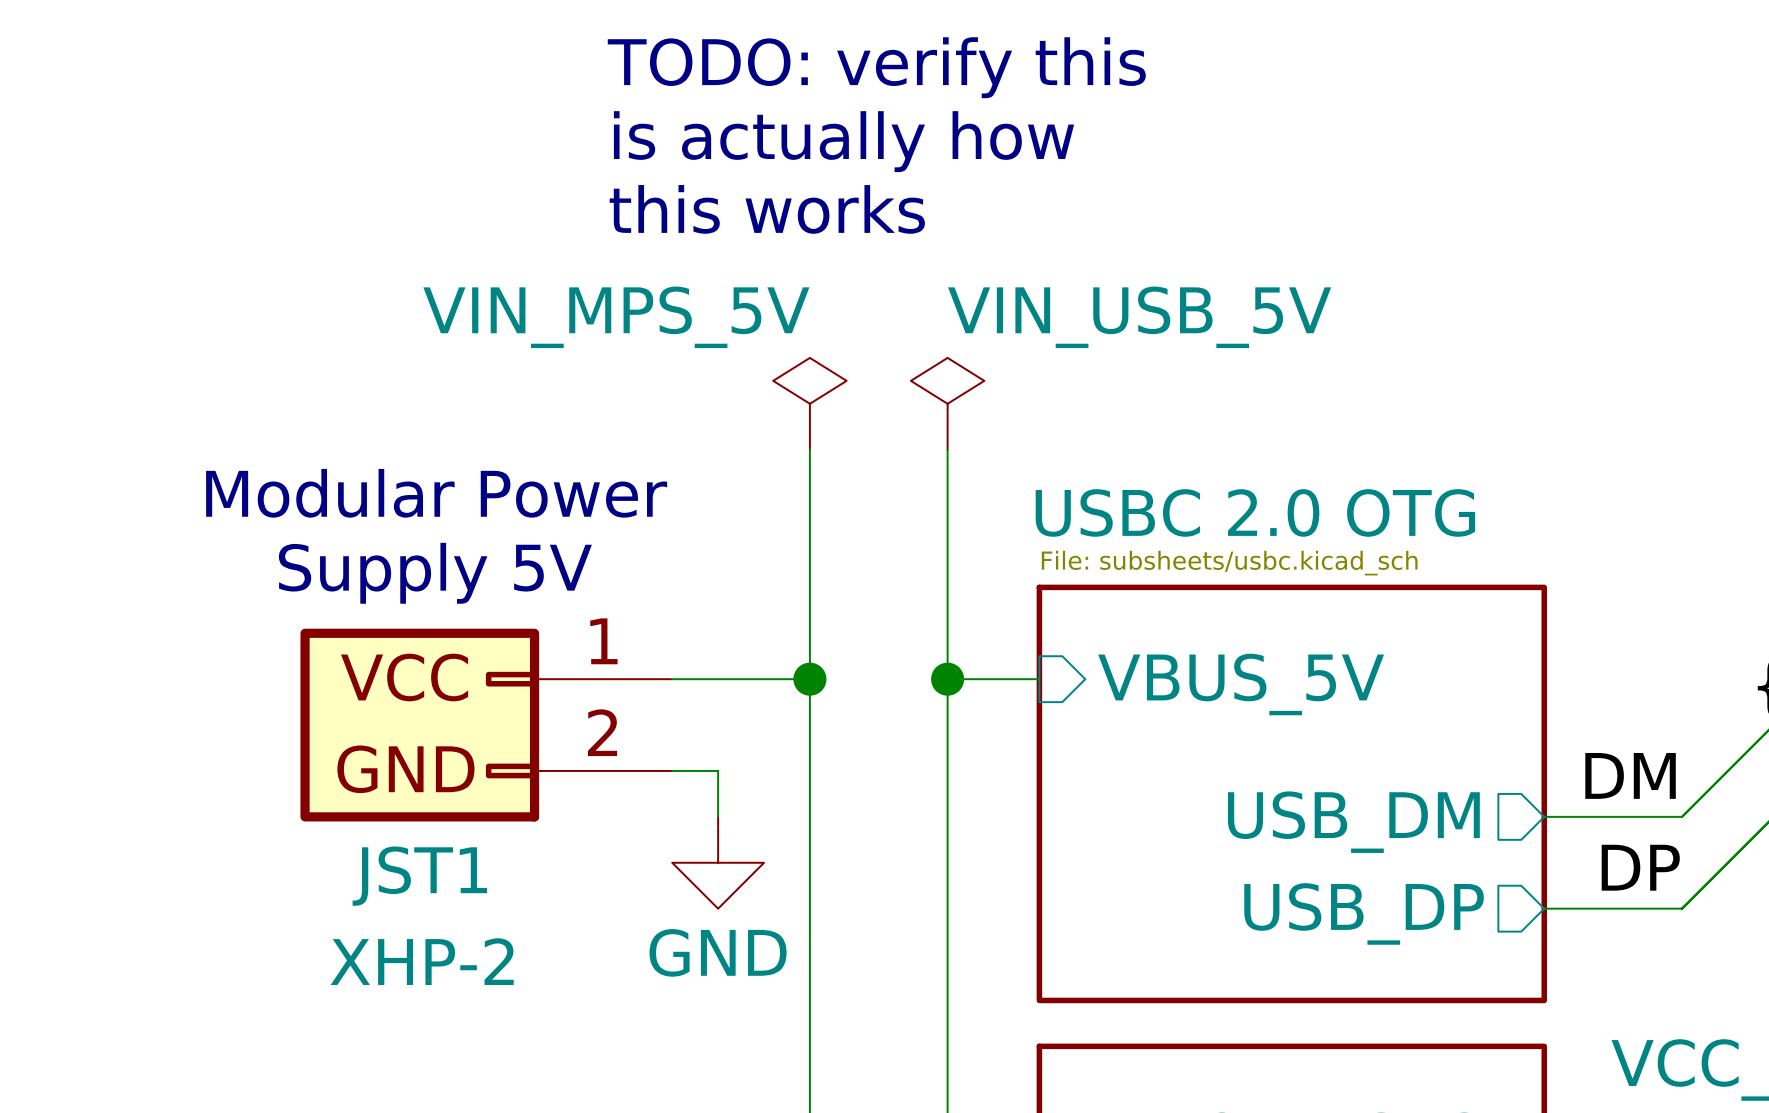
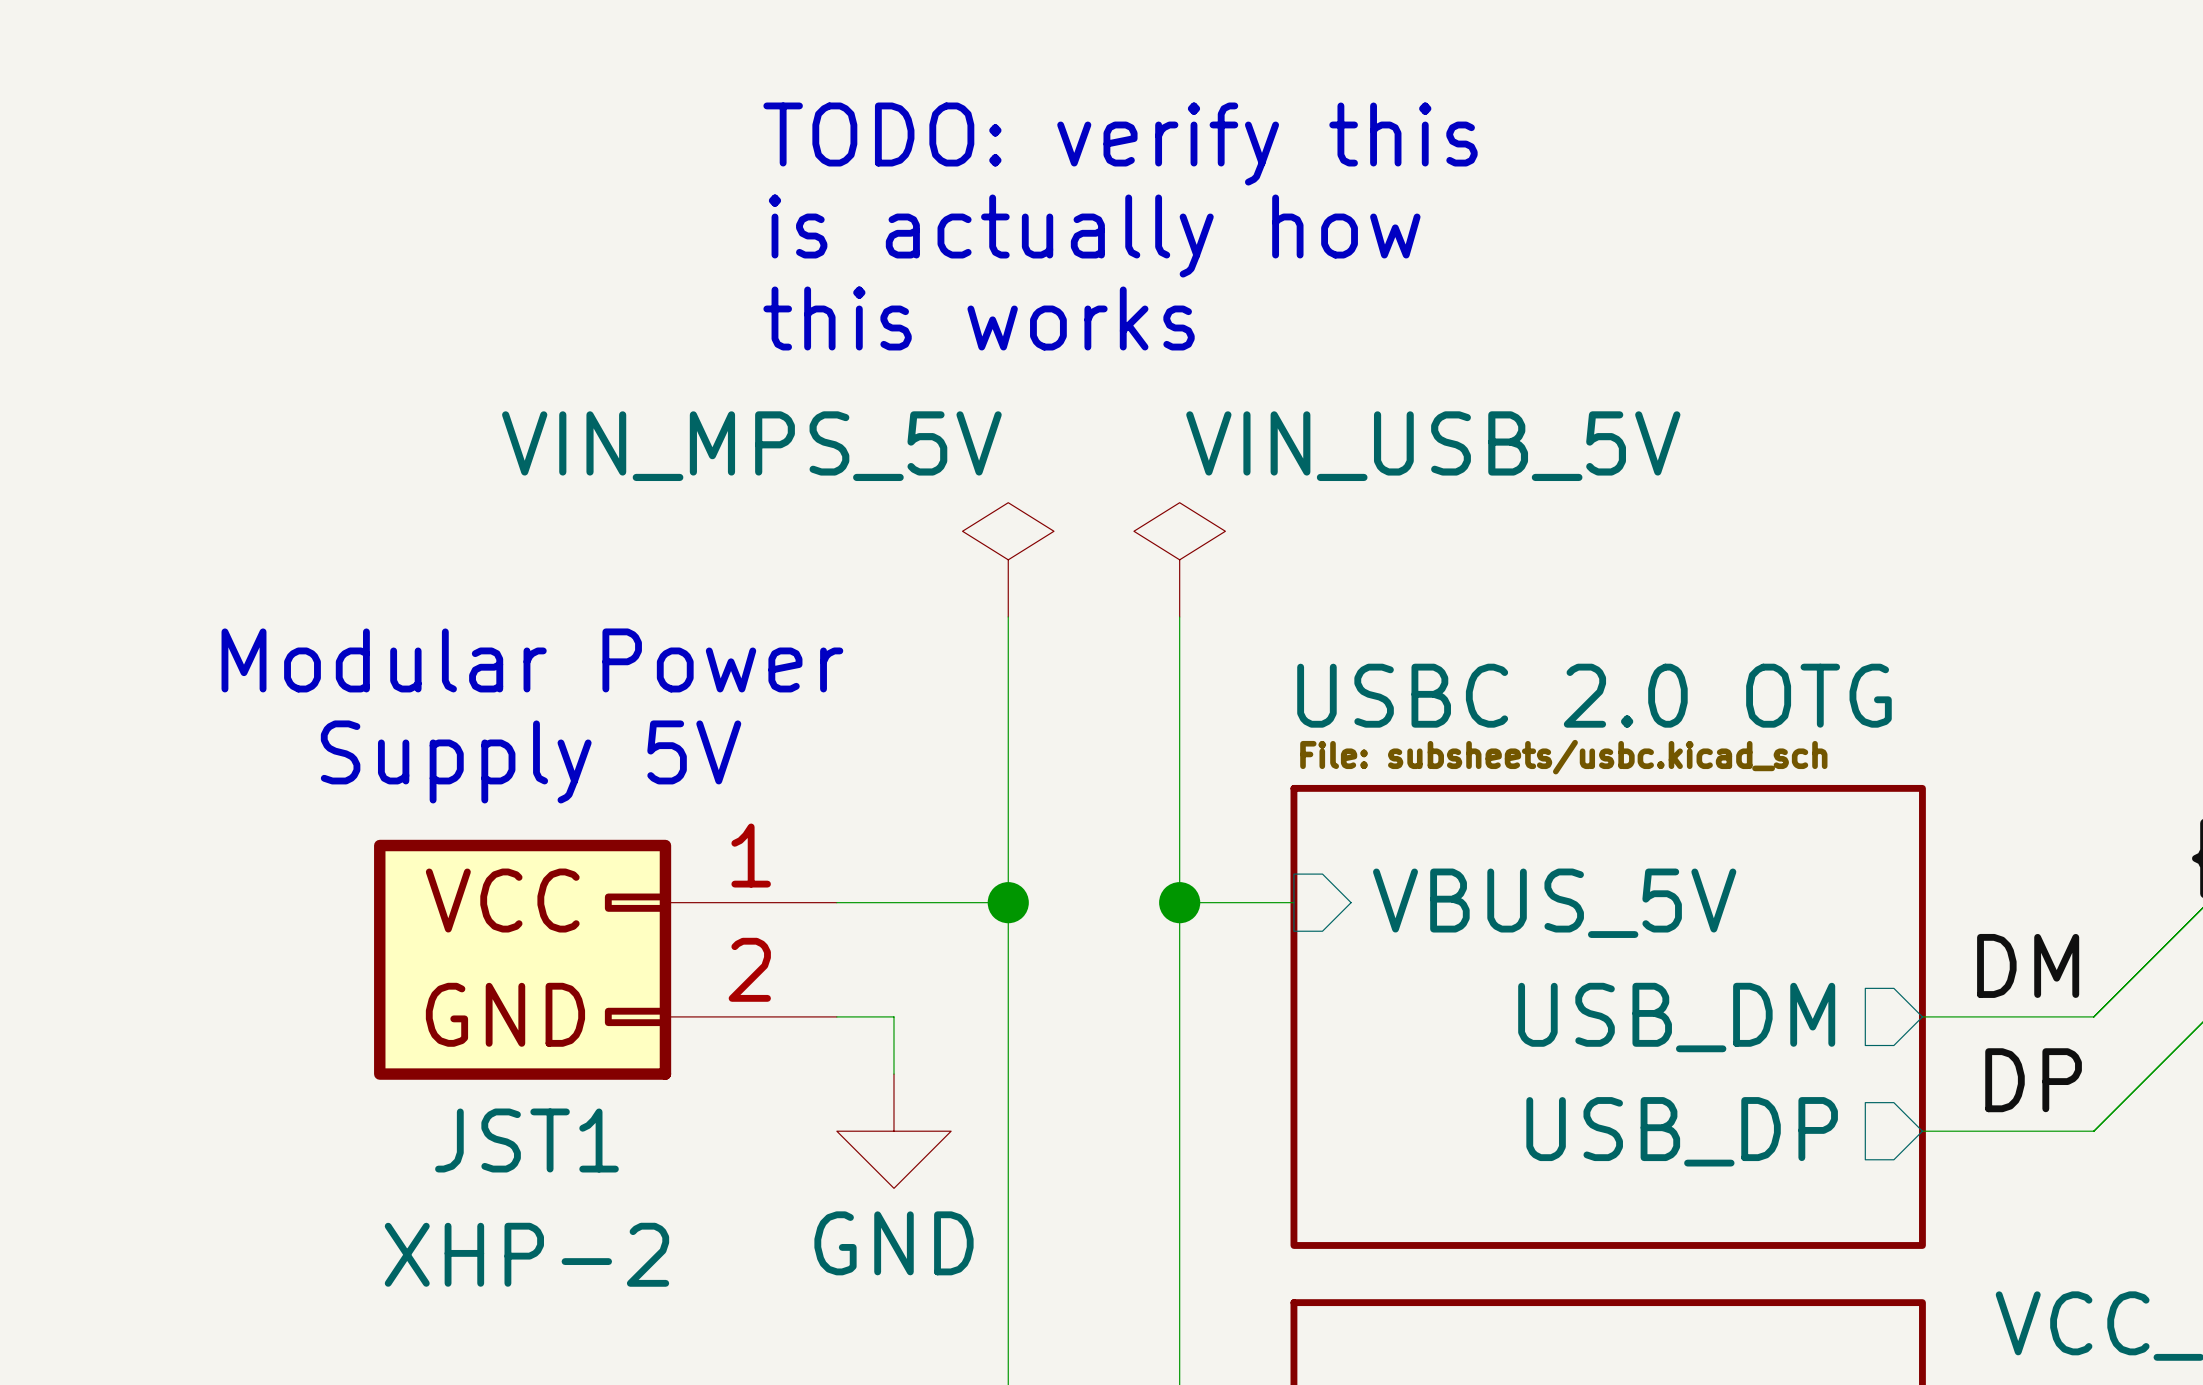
text position: TODO: verify this (876, 67) -> TODO: verify this (1120, 144)
text position: is actually how (844, 141) -> is actually how (1094, 236)
text position: this works (767, 209) -> this works (979, 318)
power symbol position: VIN_MPS_5V (809, 403) -> VIN_MPS_5V (1008, 559)
power symbol position: VIN_USB_5V (947, 403) -> VIN_USB_5V (1179, 559)
text position: Modular Power (436, 493) -> Modular Power (532, 660)
text position: Supply 5V (435, 573) -> Supply 5V (531, 761)
sheet USBC 2.0 OTG shape: [1036, 584, 1548, 1004] -> [1290, 784, 1926, 1249]
wire: (672, 679) (809, 679) -> (836, 902) (1008, 902)
junction position: (809, 679) -> (1008, 902)
wire: (947, 679) (1039, 679) -> (1179, 902) (1293, 902)
junction position: (947, 679) -> (1179, 902)
sheet pin position: VBUS_5V (1241, 684) -> VBUS_5V (1554, 903)
JST1 position: (486, 725) -> (605, 959)
wire: (672, 770) (718, 770) (718, 816) -> (836, 1016) (893, 1016) (893, 1074)
power symbol position: GND (718, 862) -> GND (893, 1131)

